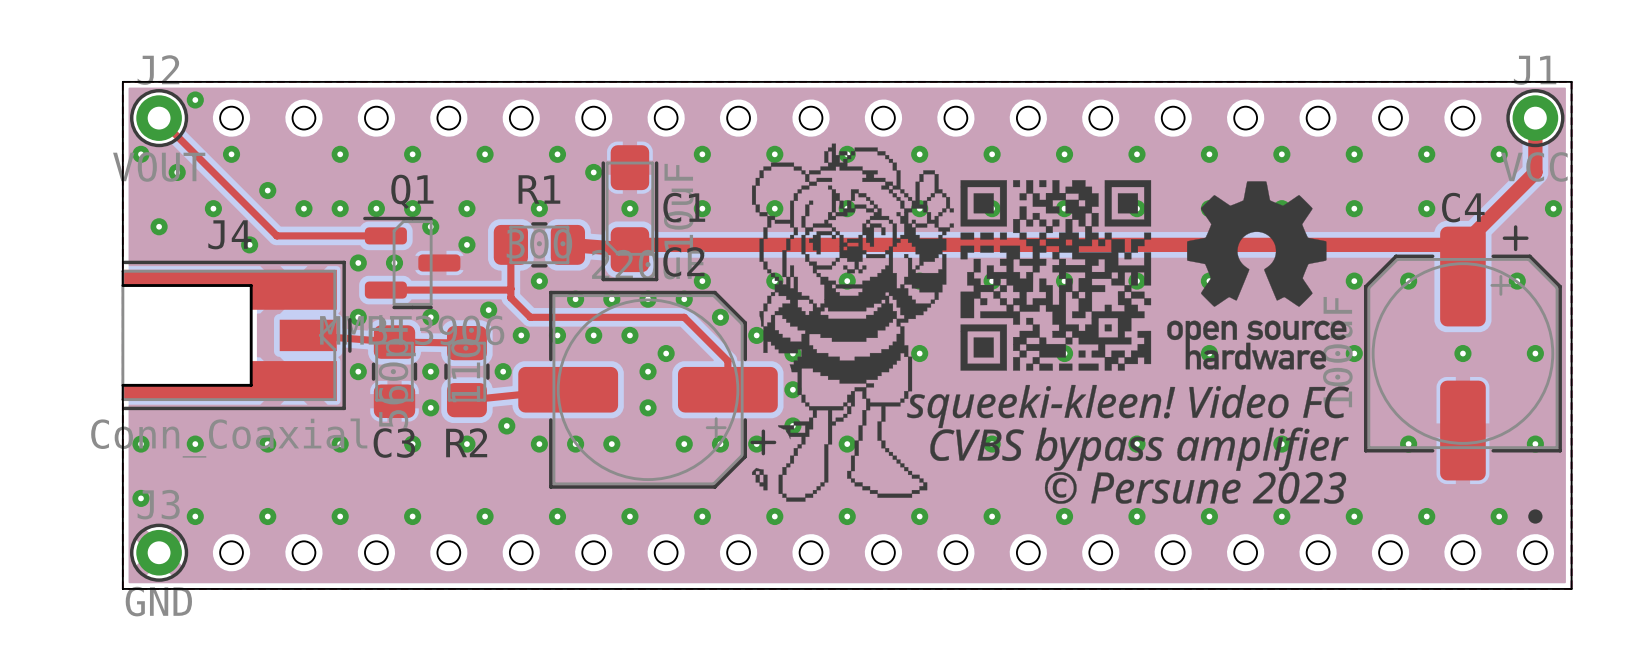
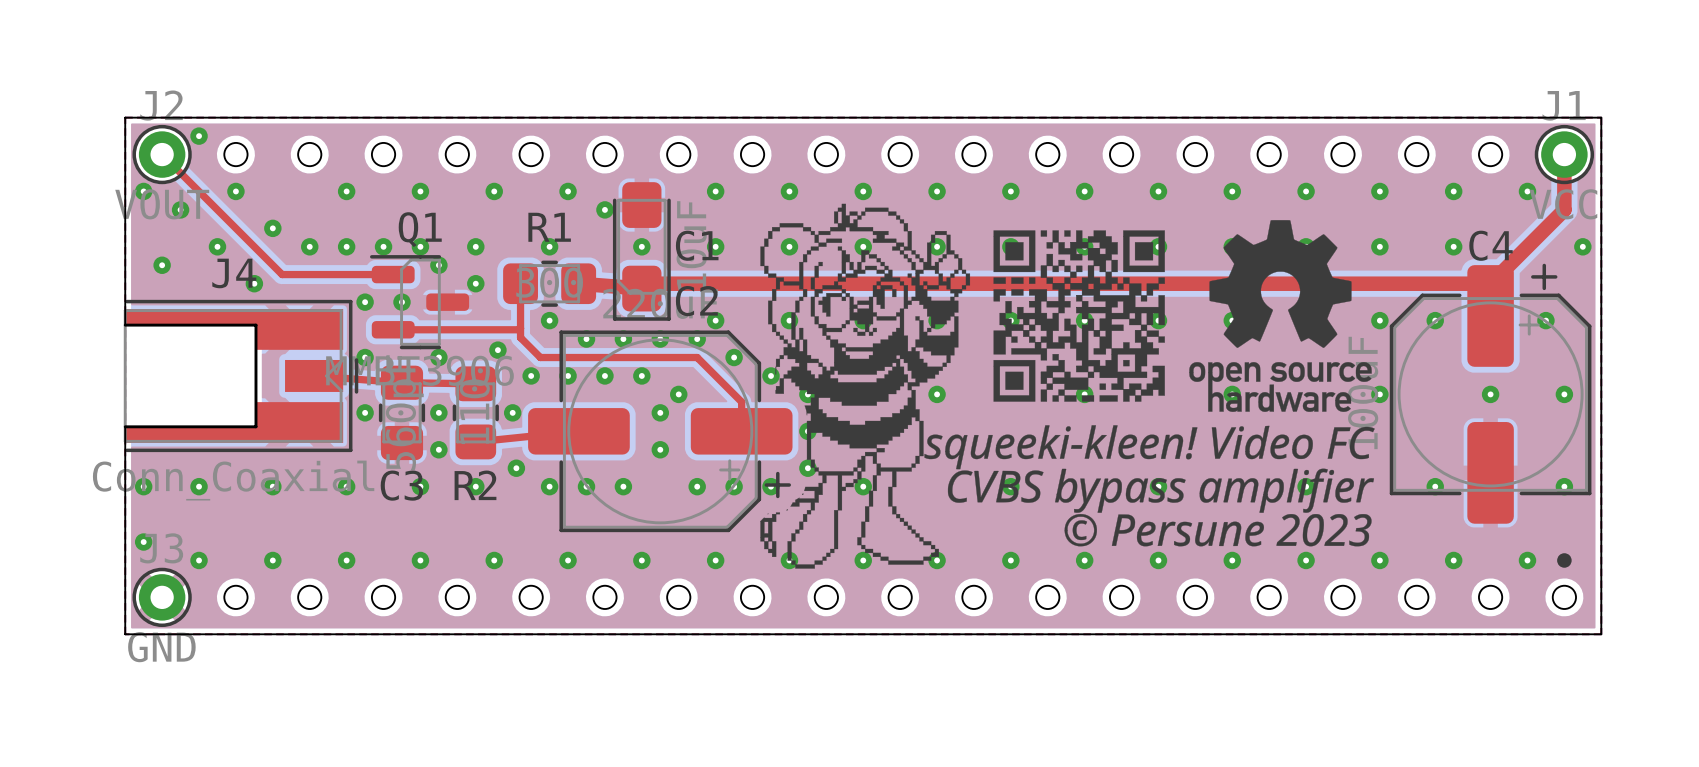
drawing shape: [751, 143, 1350, 504] -> [760, 203, 1375, 569]

